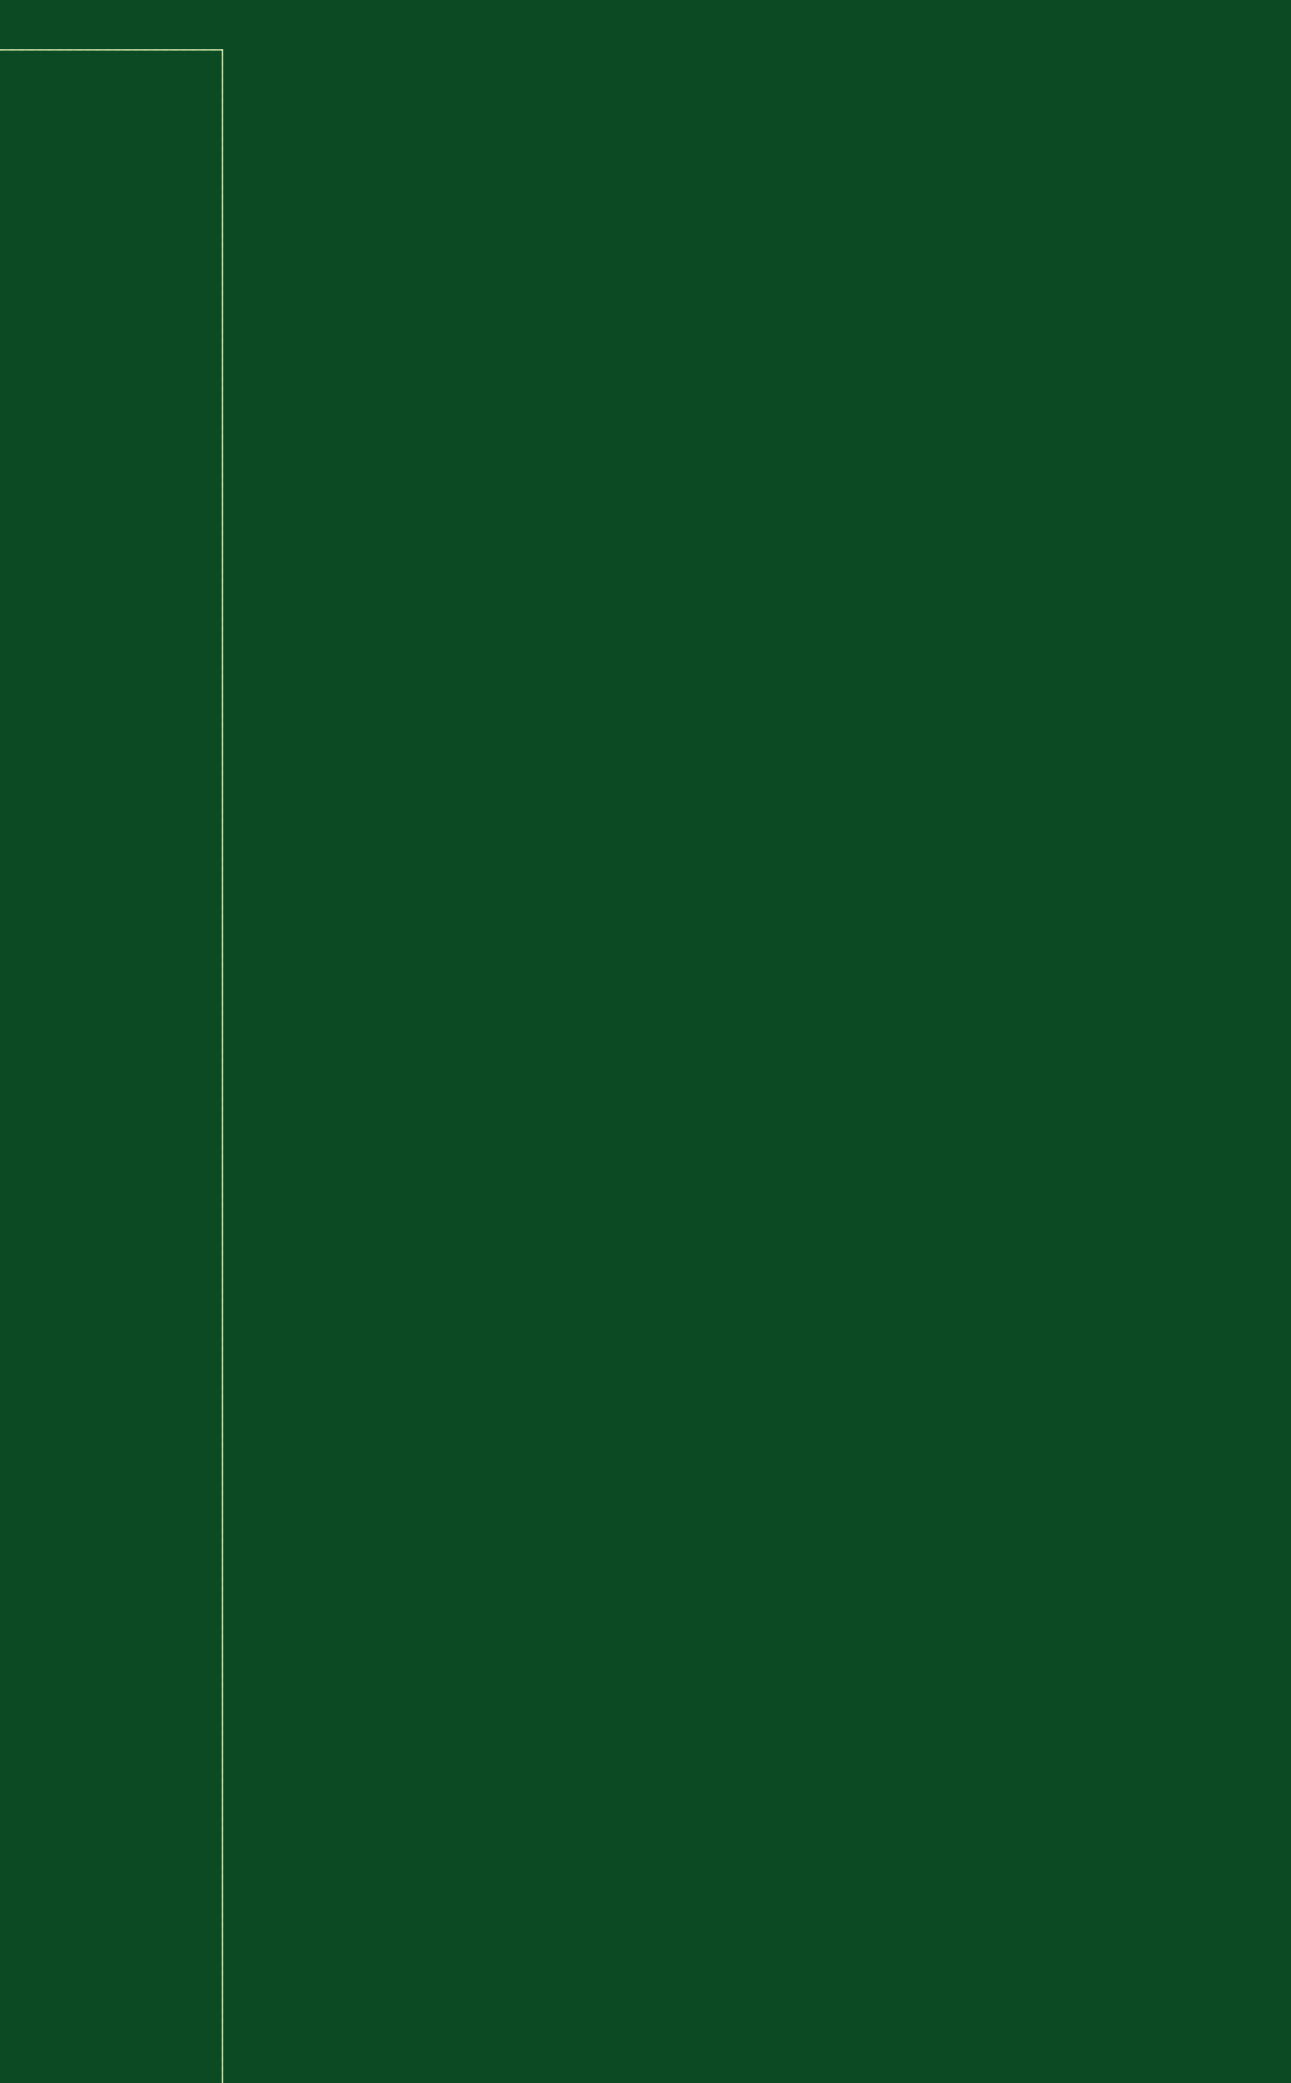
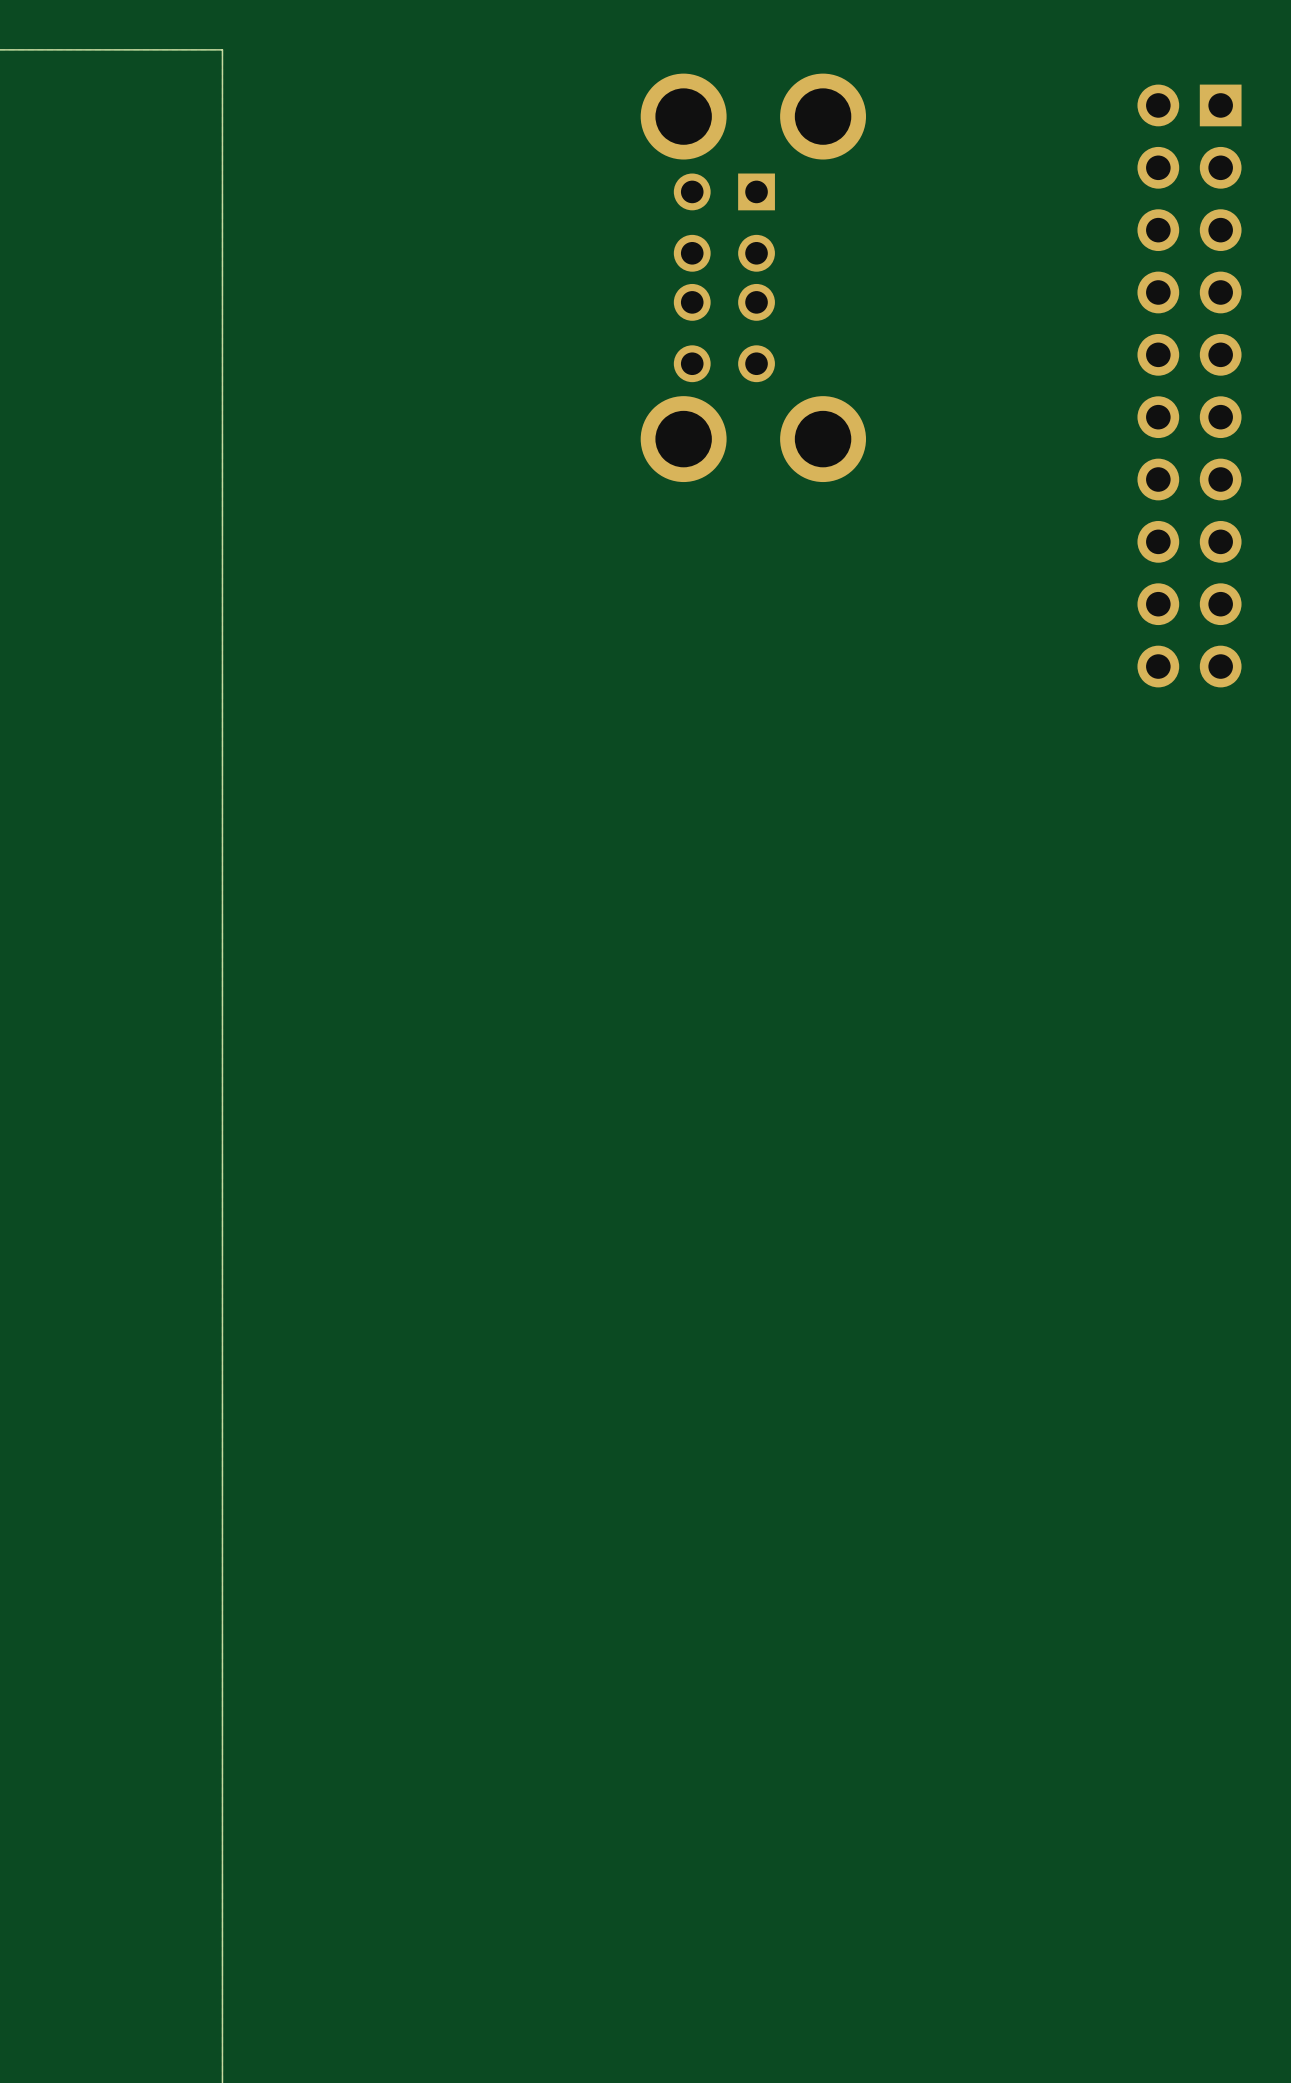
part: none -> (753, 277)
part: none -> (1189, 385)

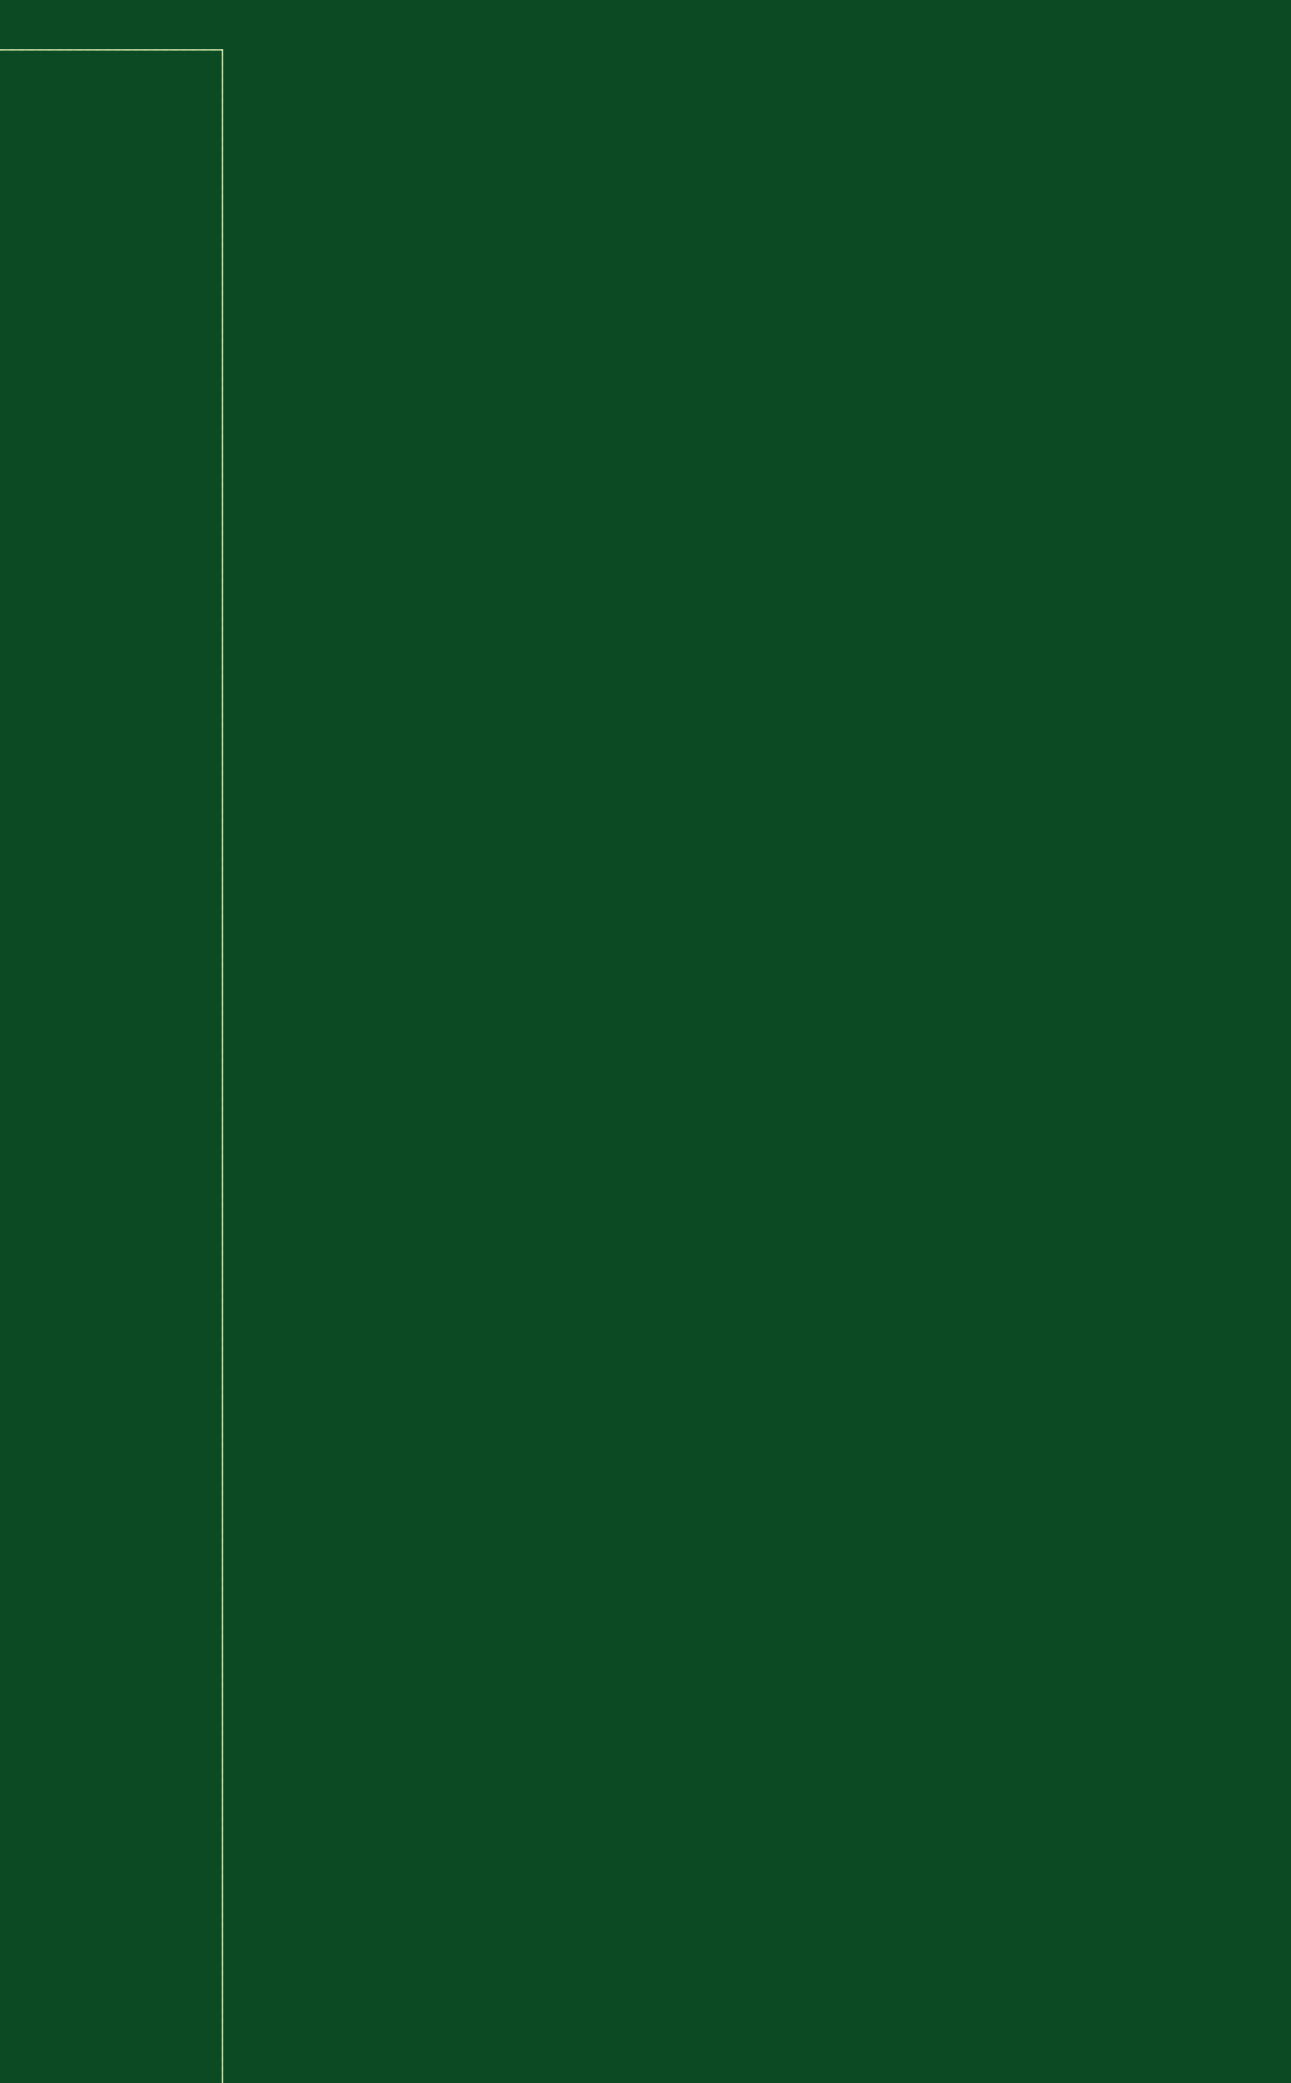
part: (753, 277) -> none
part: (1189, 385) -> none

